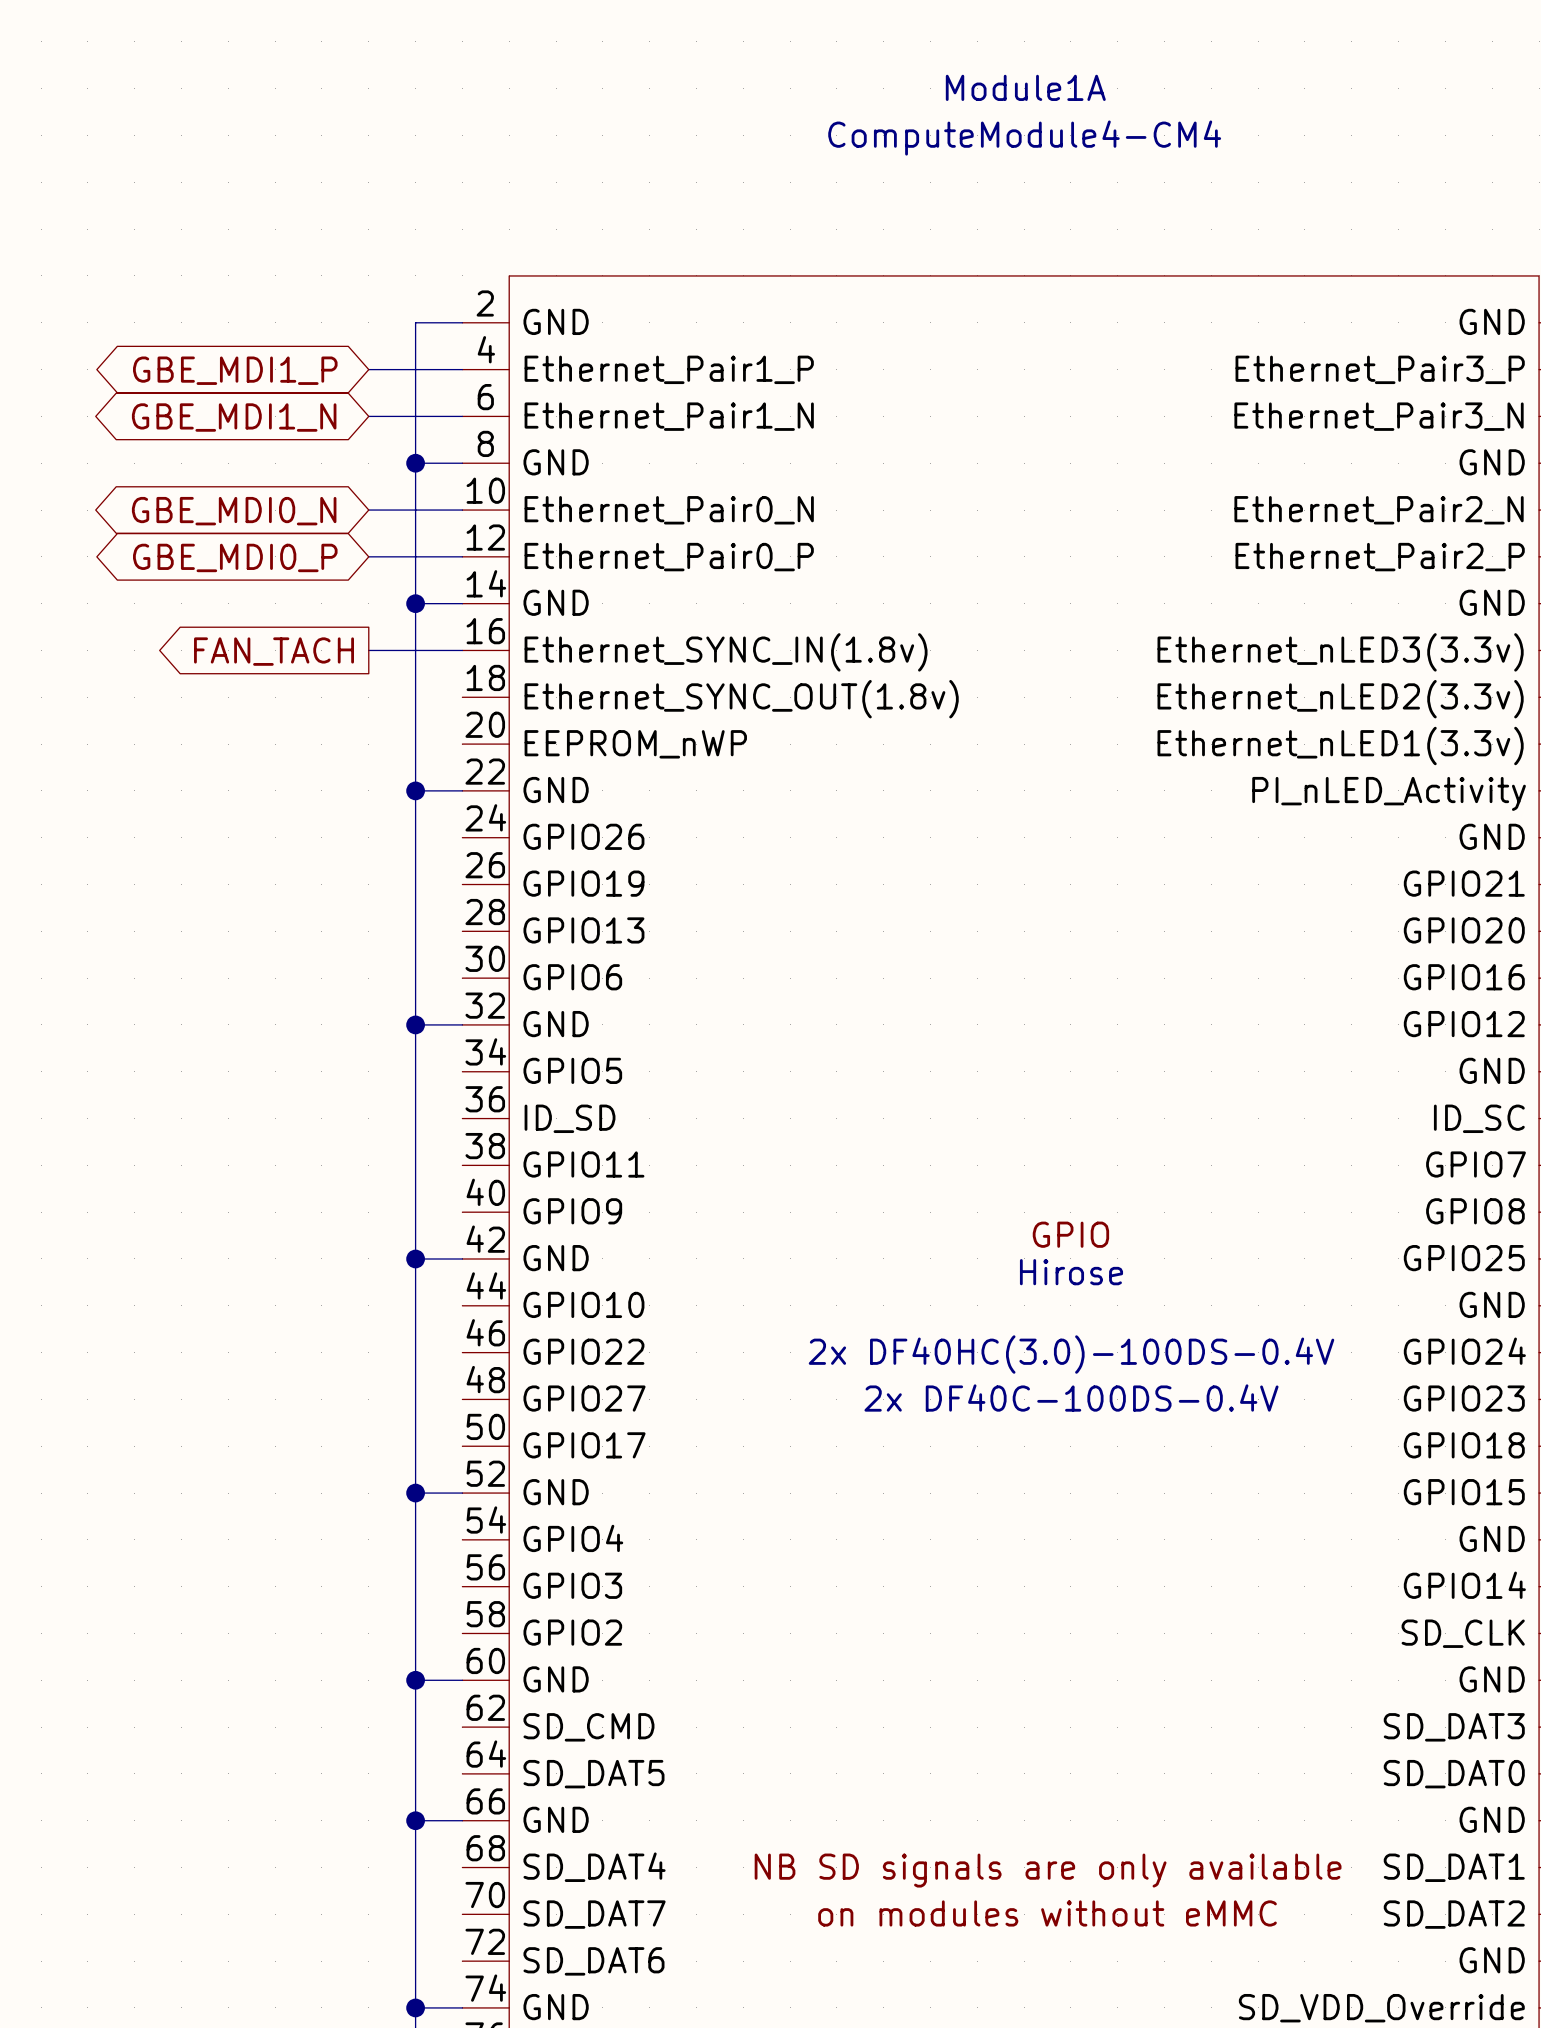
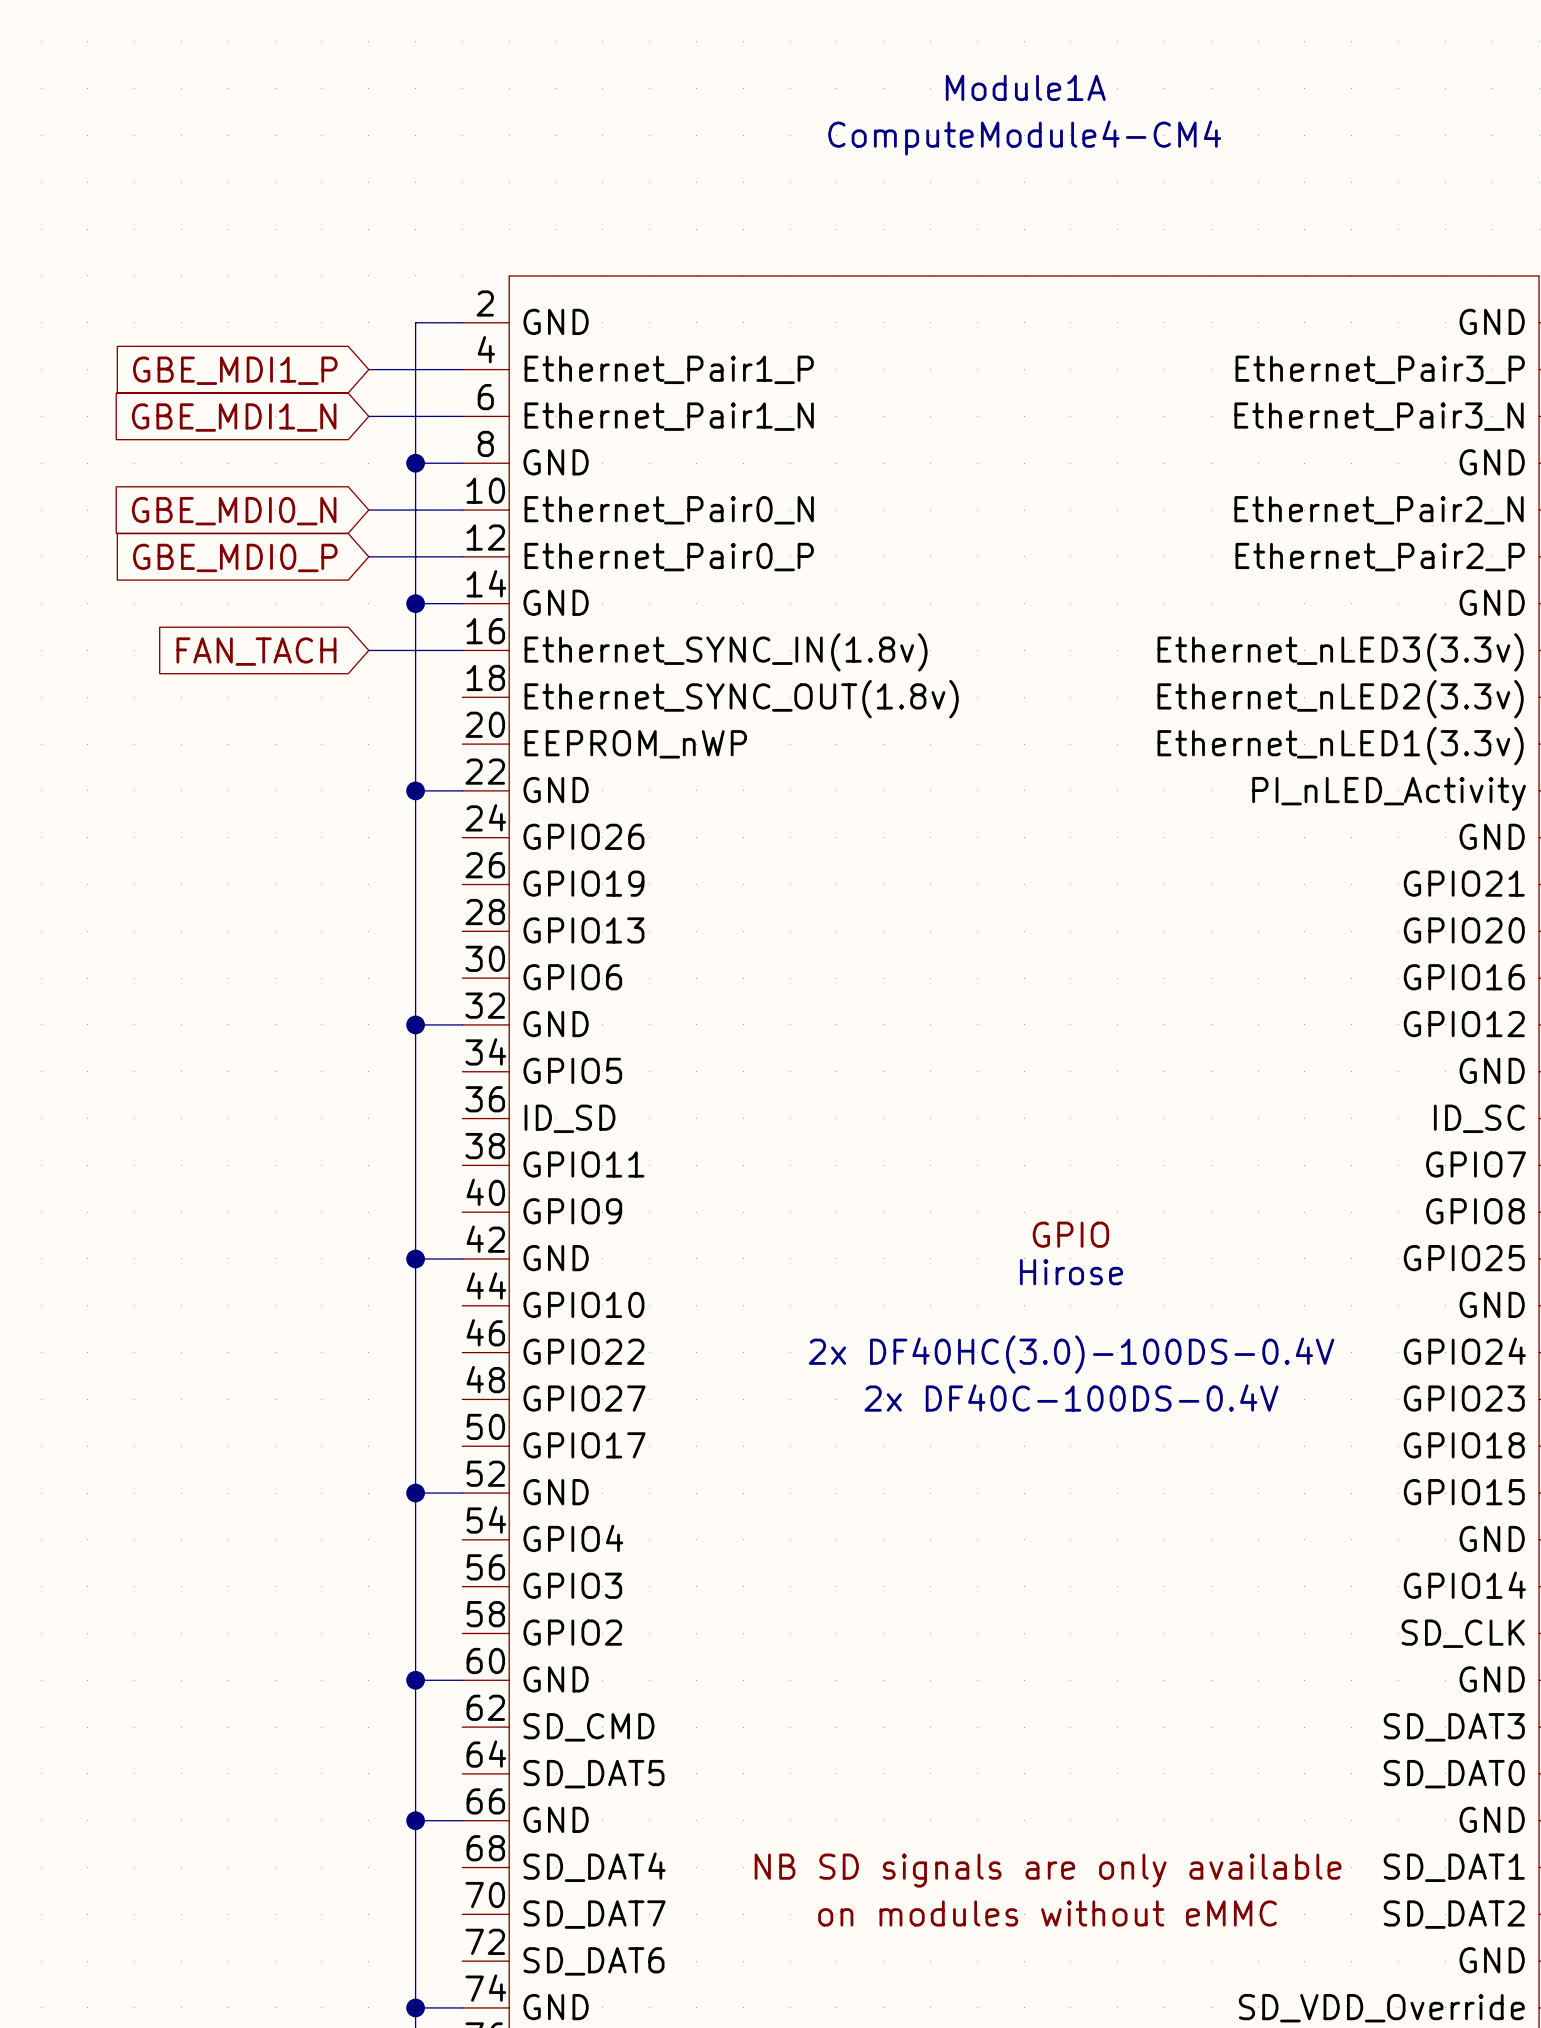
global label shape: bidirectional (235, 370) -> input (235, 370)
global label shape: bidirectional (234, 417) -> input (234, 417)
global label shape: bidirectional (234, 511) -> input (234, 511)
global label shape: bidirectional (235, 557) -> input (235, 557)
global label shape: output (274, 651) -> input (256, 651)

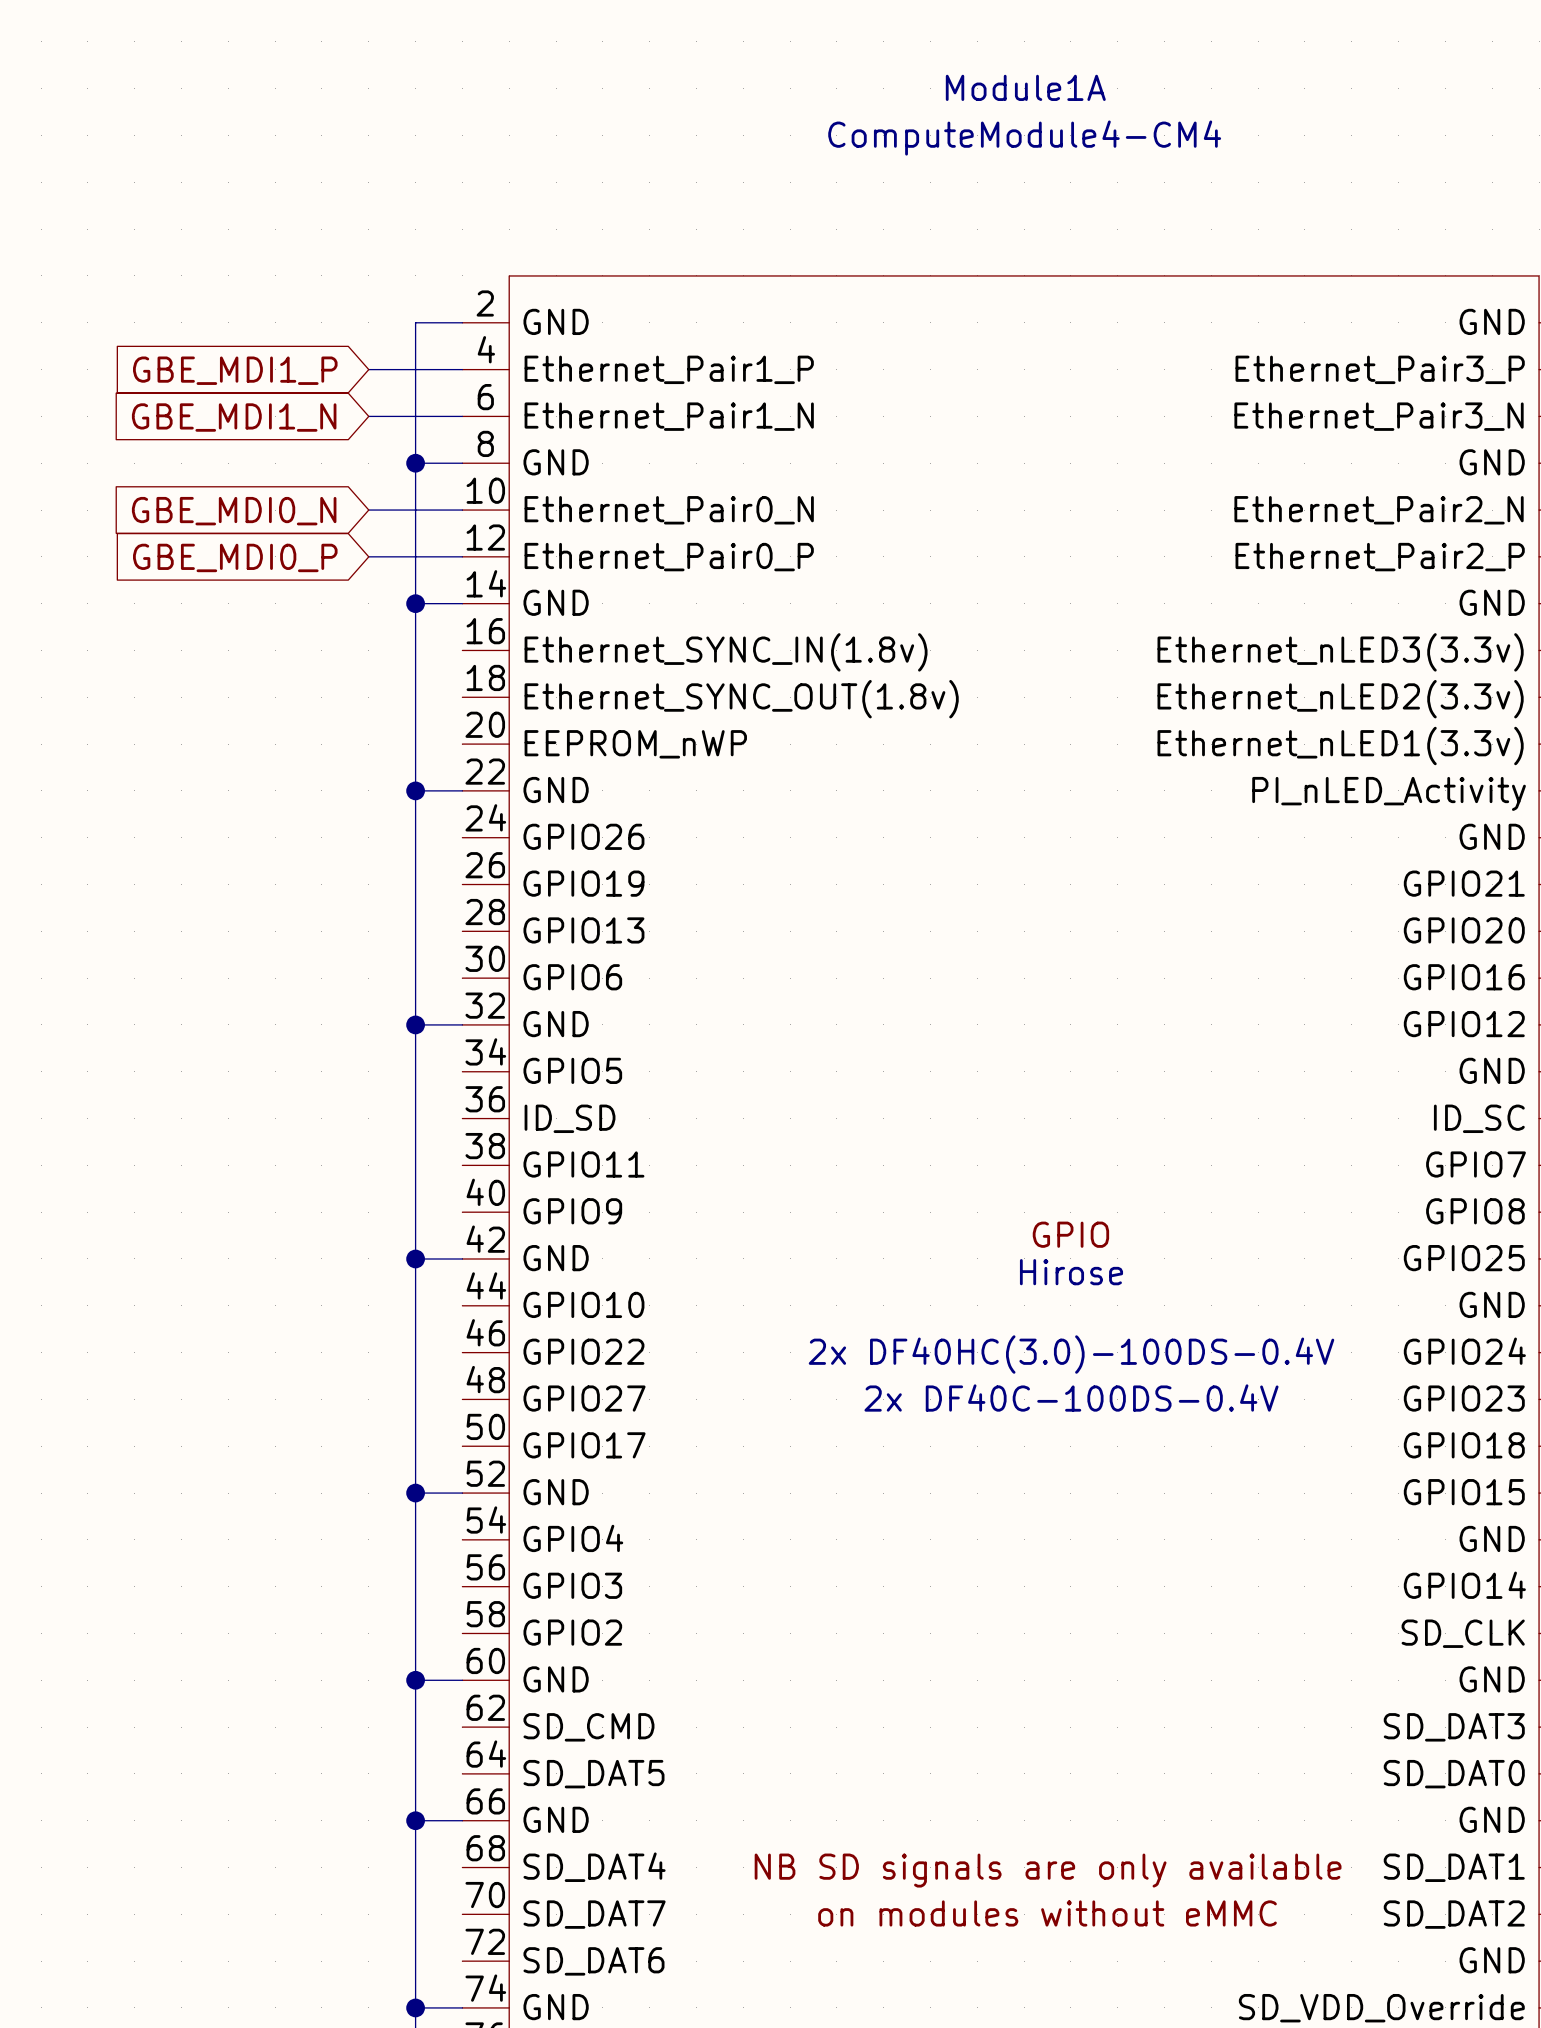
wire: (368, 650) (462, 650) -> none
global label: FAN_TACH (256, 651) -> none

